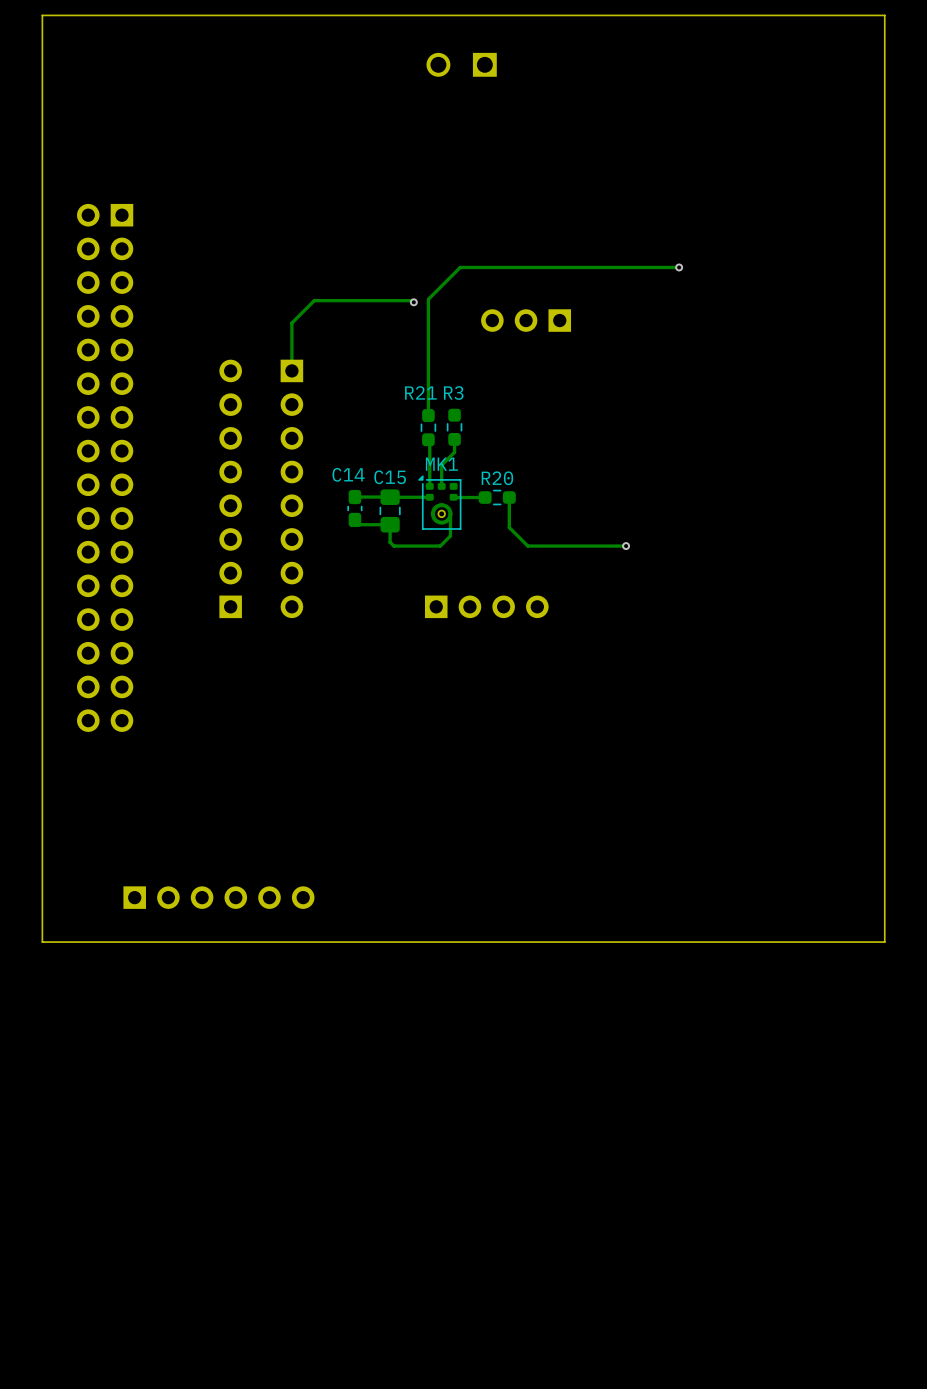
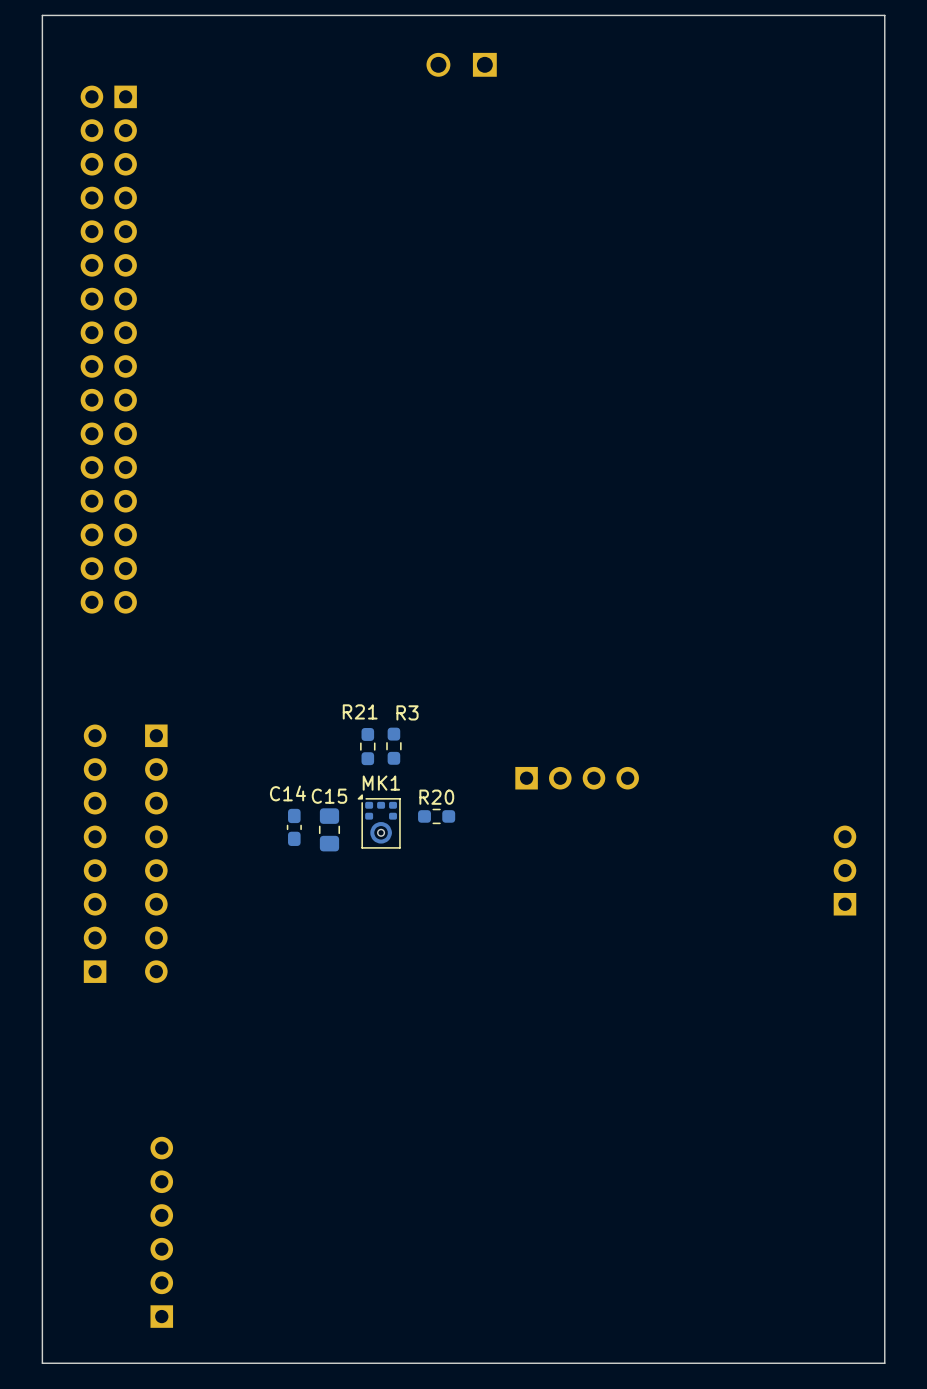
track: (679, 267) (460, 267) (428, 299) (428, 415) -> none
via: (679, 267) -> none
track: (413, 302) (412, 300) (314, 300) (291, 323) (291, 370) -> none
via: (413, 302) -> none
part: (526, 320) -> none
R3 name position: R3 (453, 393) -> R3 (407, 712)
R21 position: (428, 427) -> (367, 746)
R3 position: (454, 427) -> (393, 746)
track: (428, 439) (429, 486) -> none
track: (454, 439) (454, 452) (441, 465) (441, 486) -> none
part position: (105, 467) -> (108, 349)
part: (230, 488) -> none
part: (291, 488) -> none
track: (384, 497) (354, 497) -> none
track: (429, 497) (390, 497) -> none
track: (453, 497) (485, 497) -> none
R20 position: (497, 497) -> (436, 816)
track: (509, 497) (509, 527) (527, 546) (626, 546) -> none
MK1 position: (439, 502) -> (379, 821)
C14 position: (354, 508) -> (294, 827)
C15 position: (390, 510) -> (329, 829)
track: (450, 513) (450, 535) (440, 546) (393, 546) (390, 542) (390, 524) (359, 524) (354, 519) -> none
via: (626, 546) -> none
part position: (486, 606) -> (577, 778)
part: none -> (95, 853)
part: none -> (156, 853)
part: none -> (844, 870)
part: (218, 897) -> none
board edge: (884, 942) (42, 942) -> (884, 942) (884, 1363) (42, 1363) (42, 942)
part: none -> (161, 1232)

